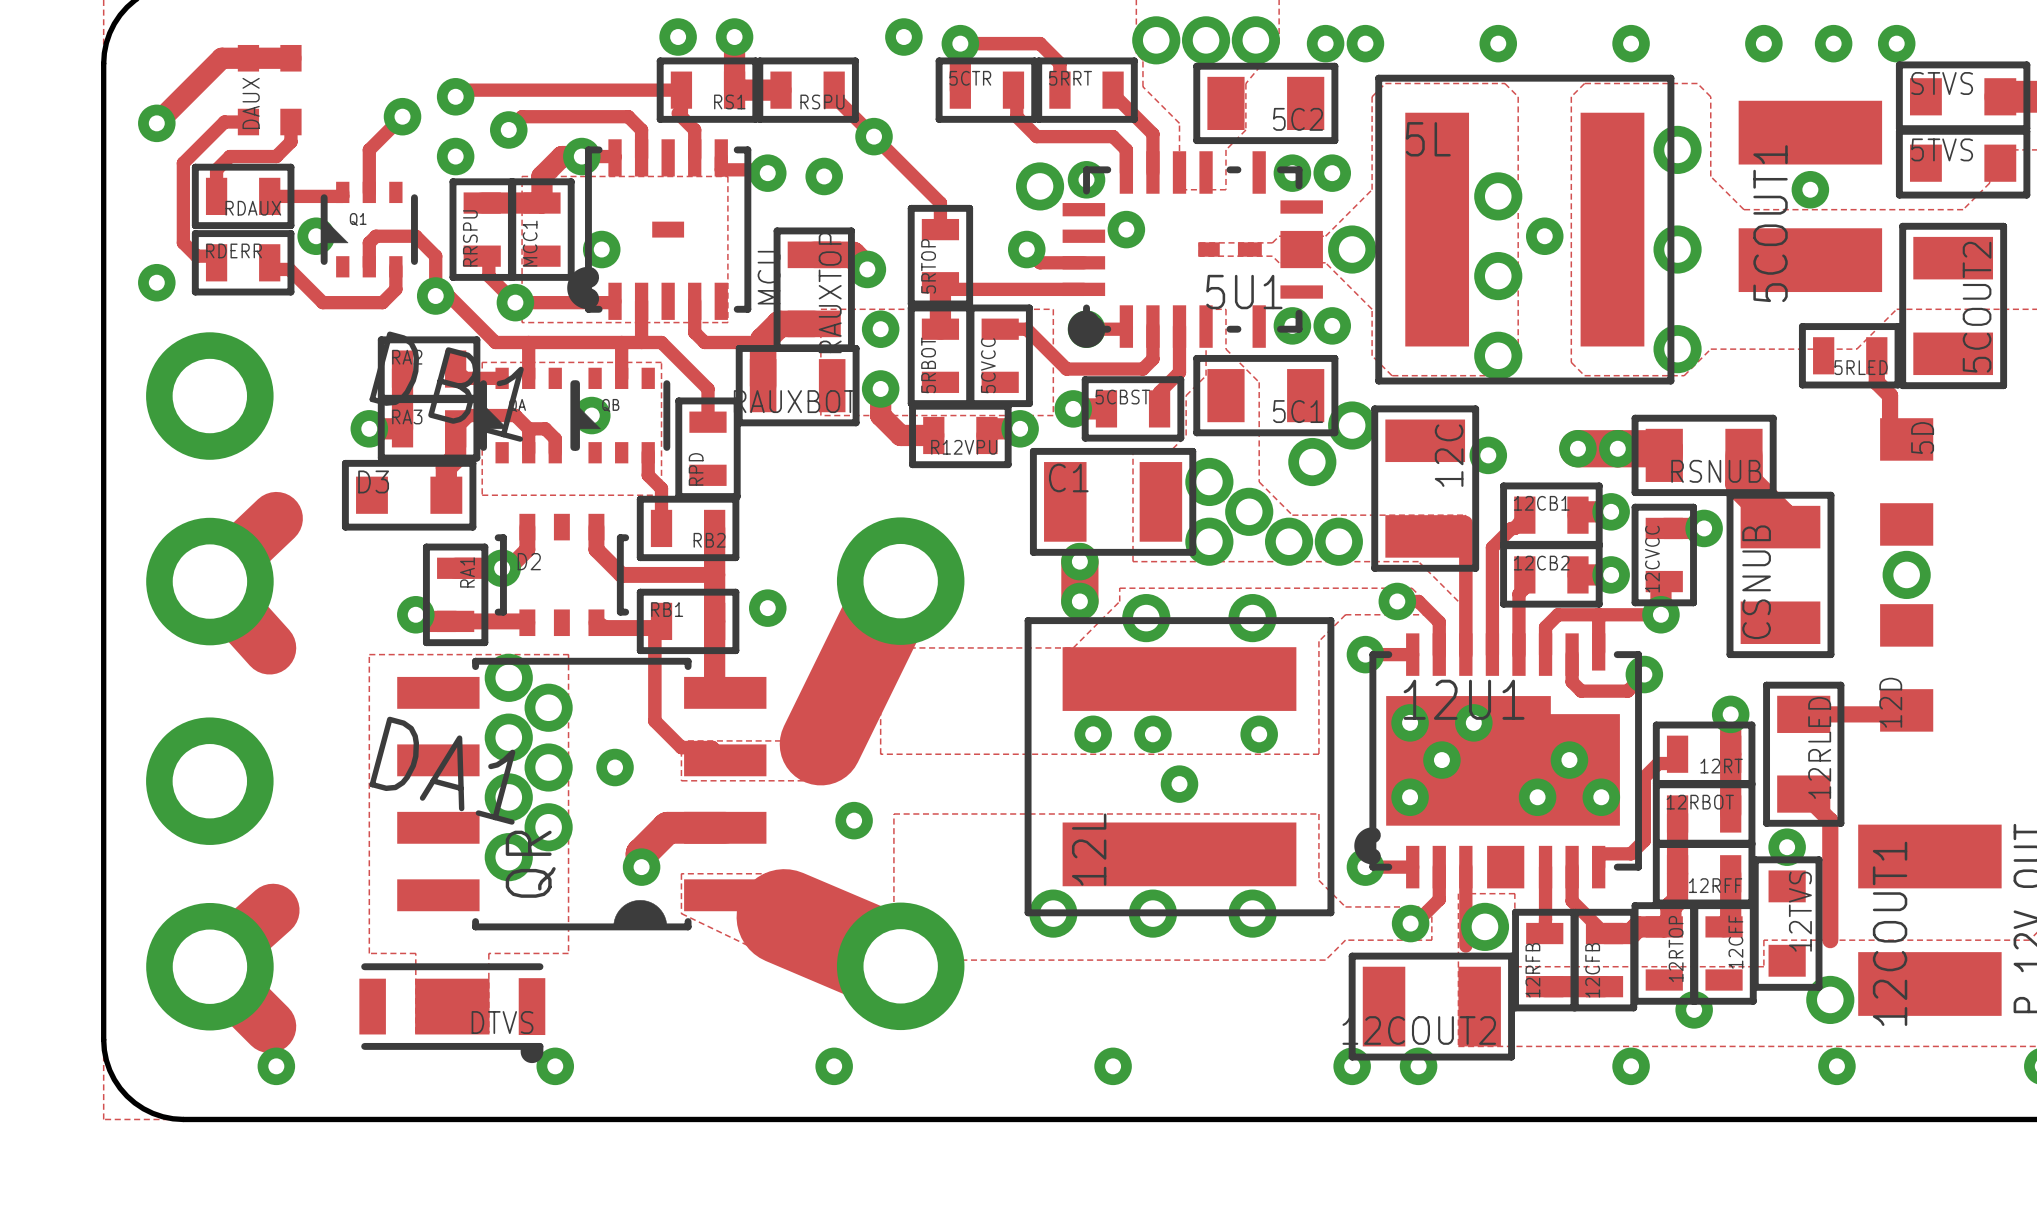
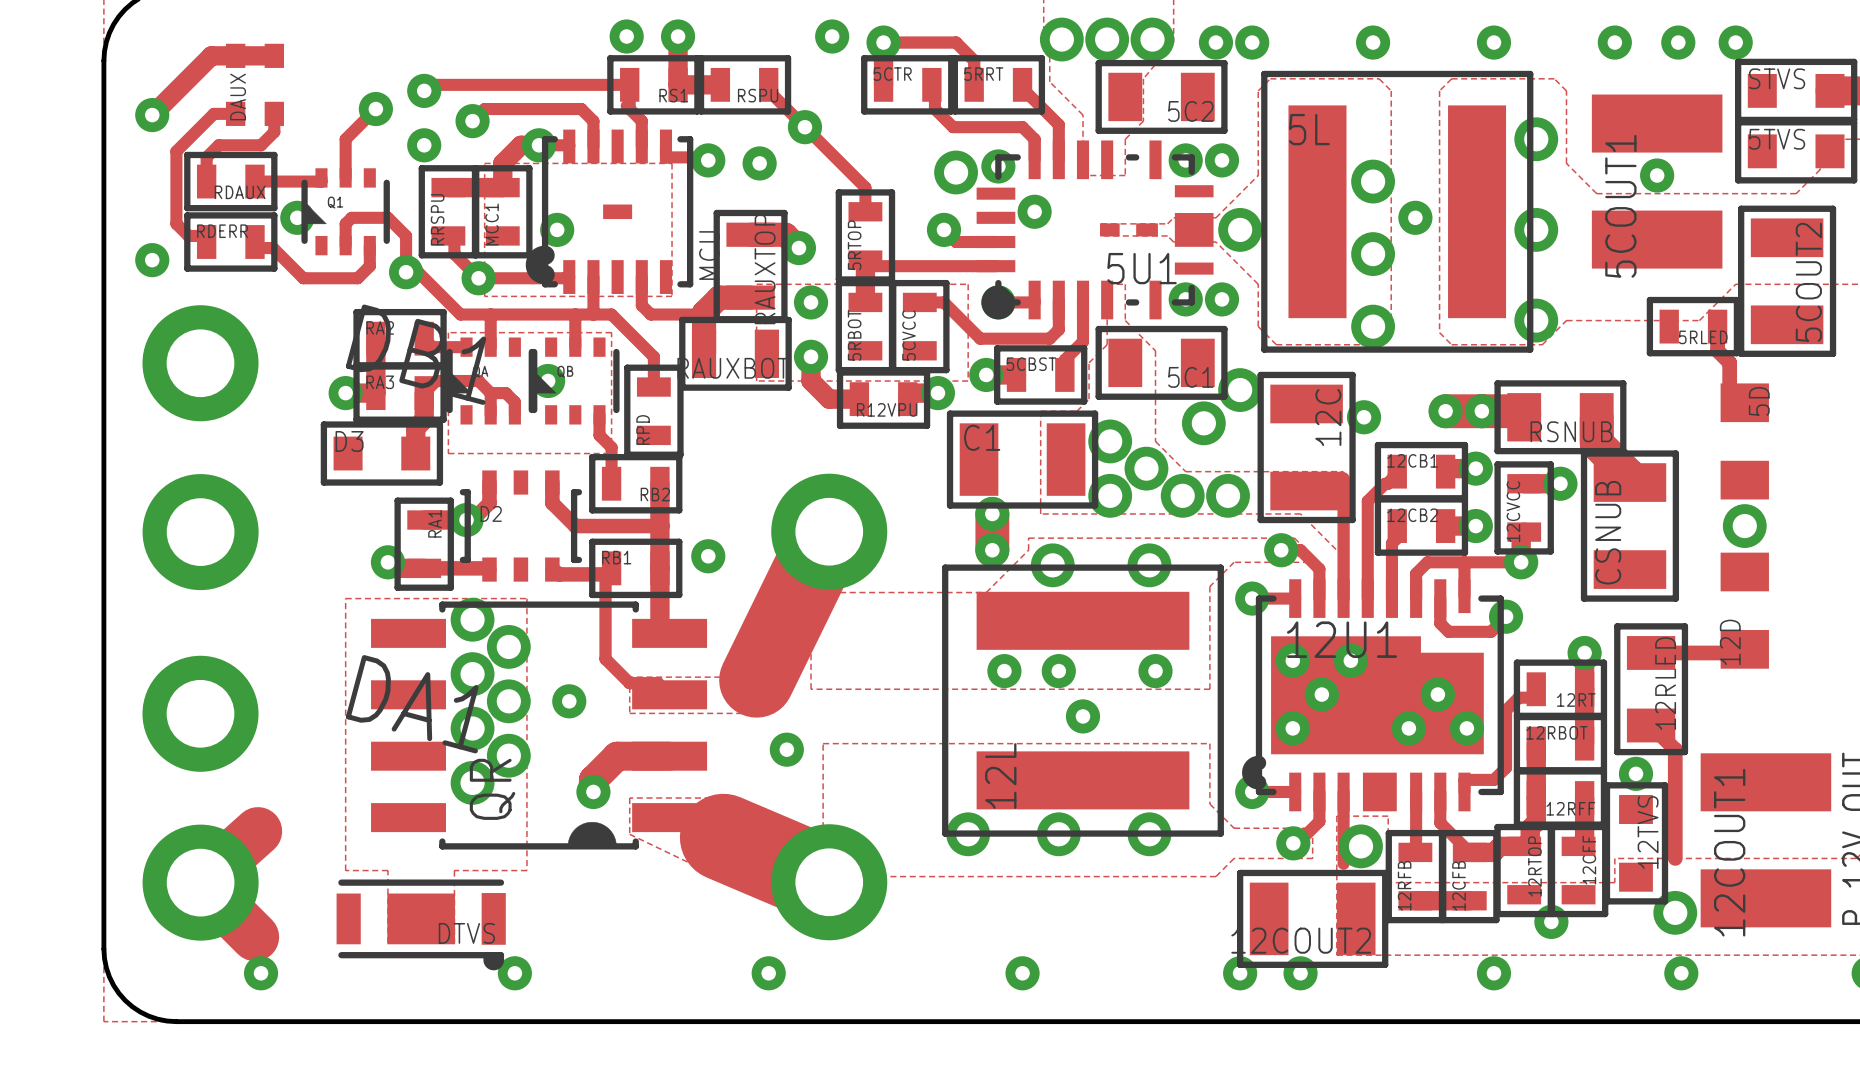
track: (276, 518) (209, 581) (269, 647) -> none

